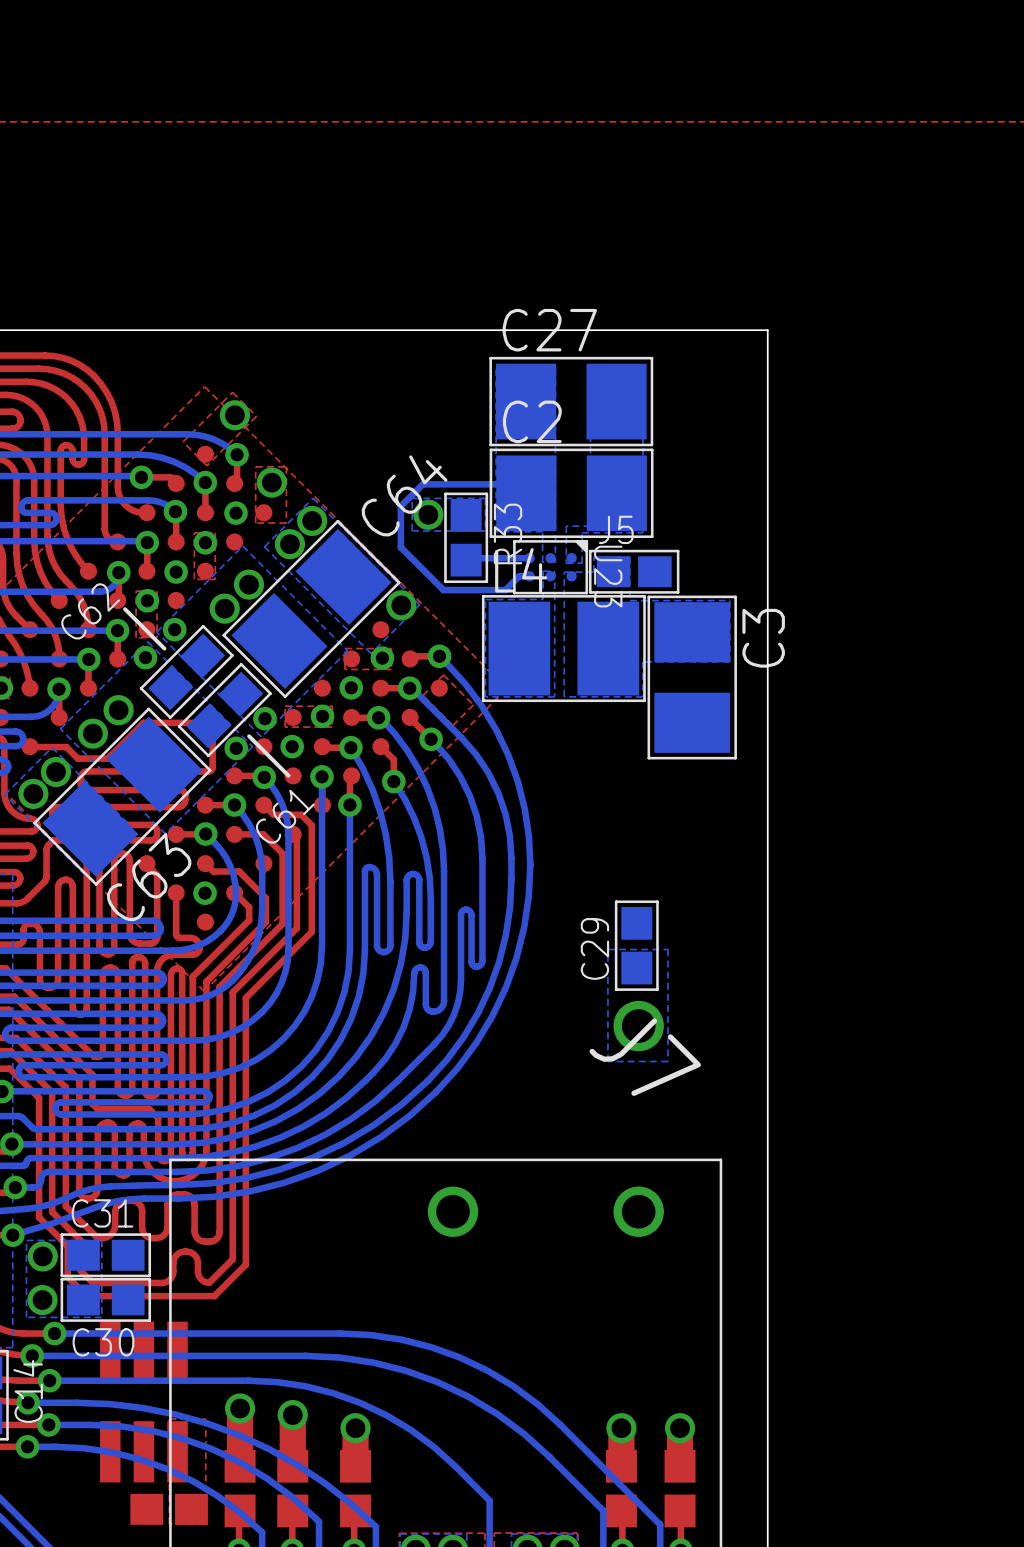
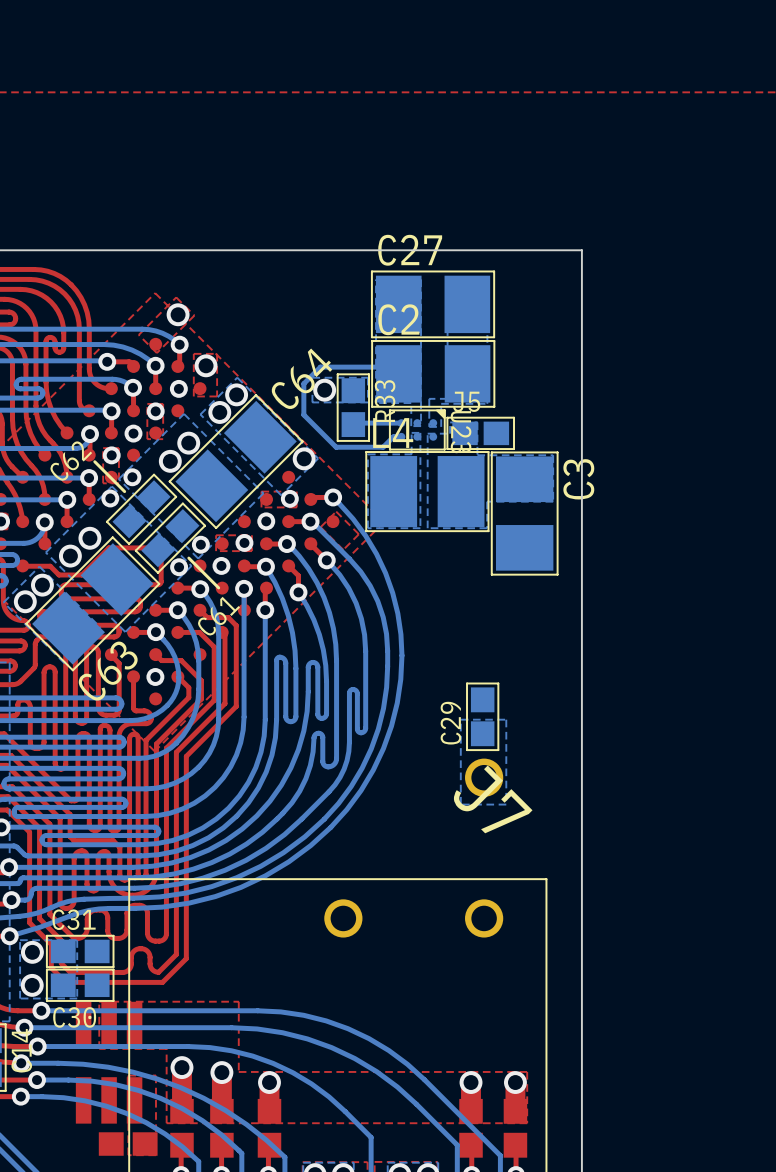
top zone outline: none -> (238, 1001) (99, 1001) (99, 1048) (166, 1048) (166, 1123) (527, 1123) (527, 1071) (238, 1071) (238, 1001)

